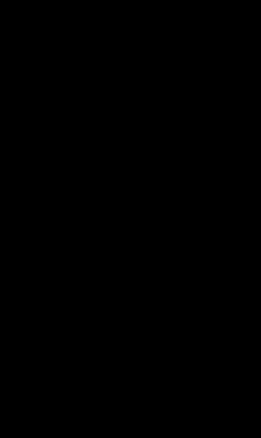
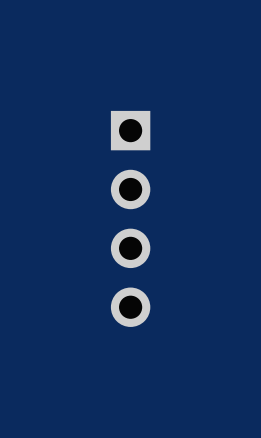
part: none -> (130, 218)

